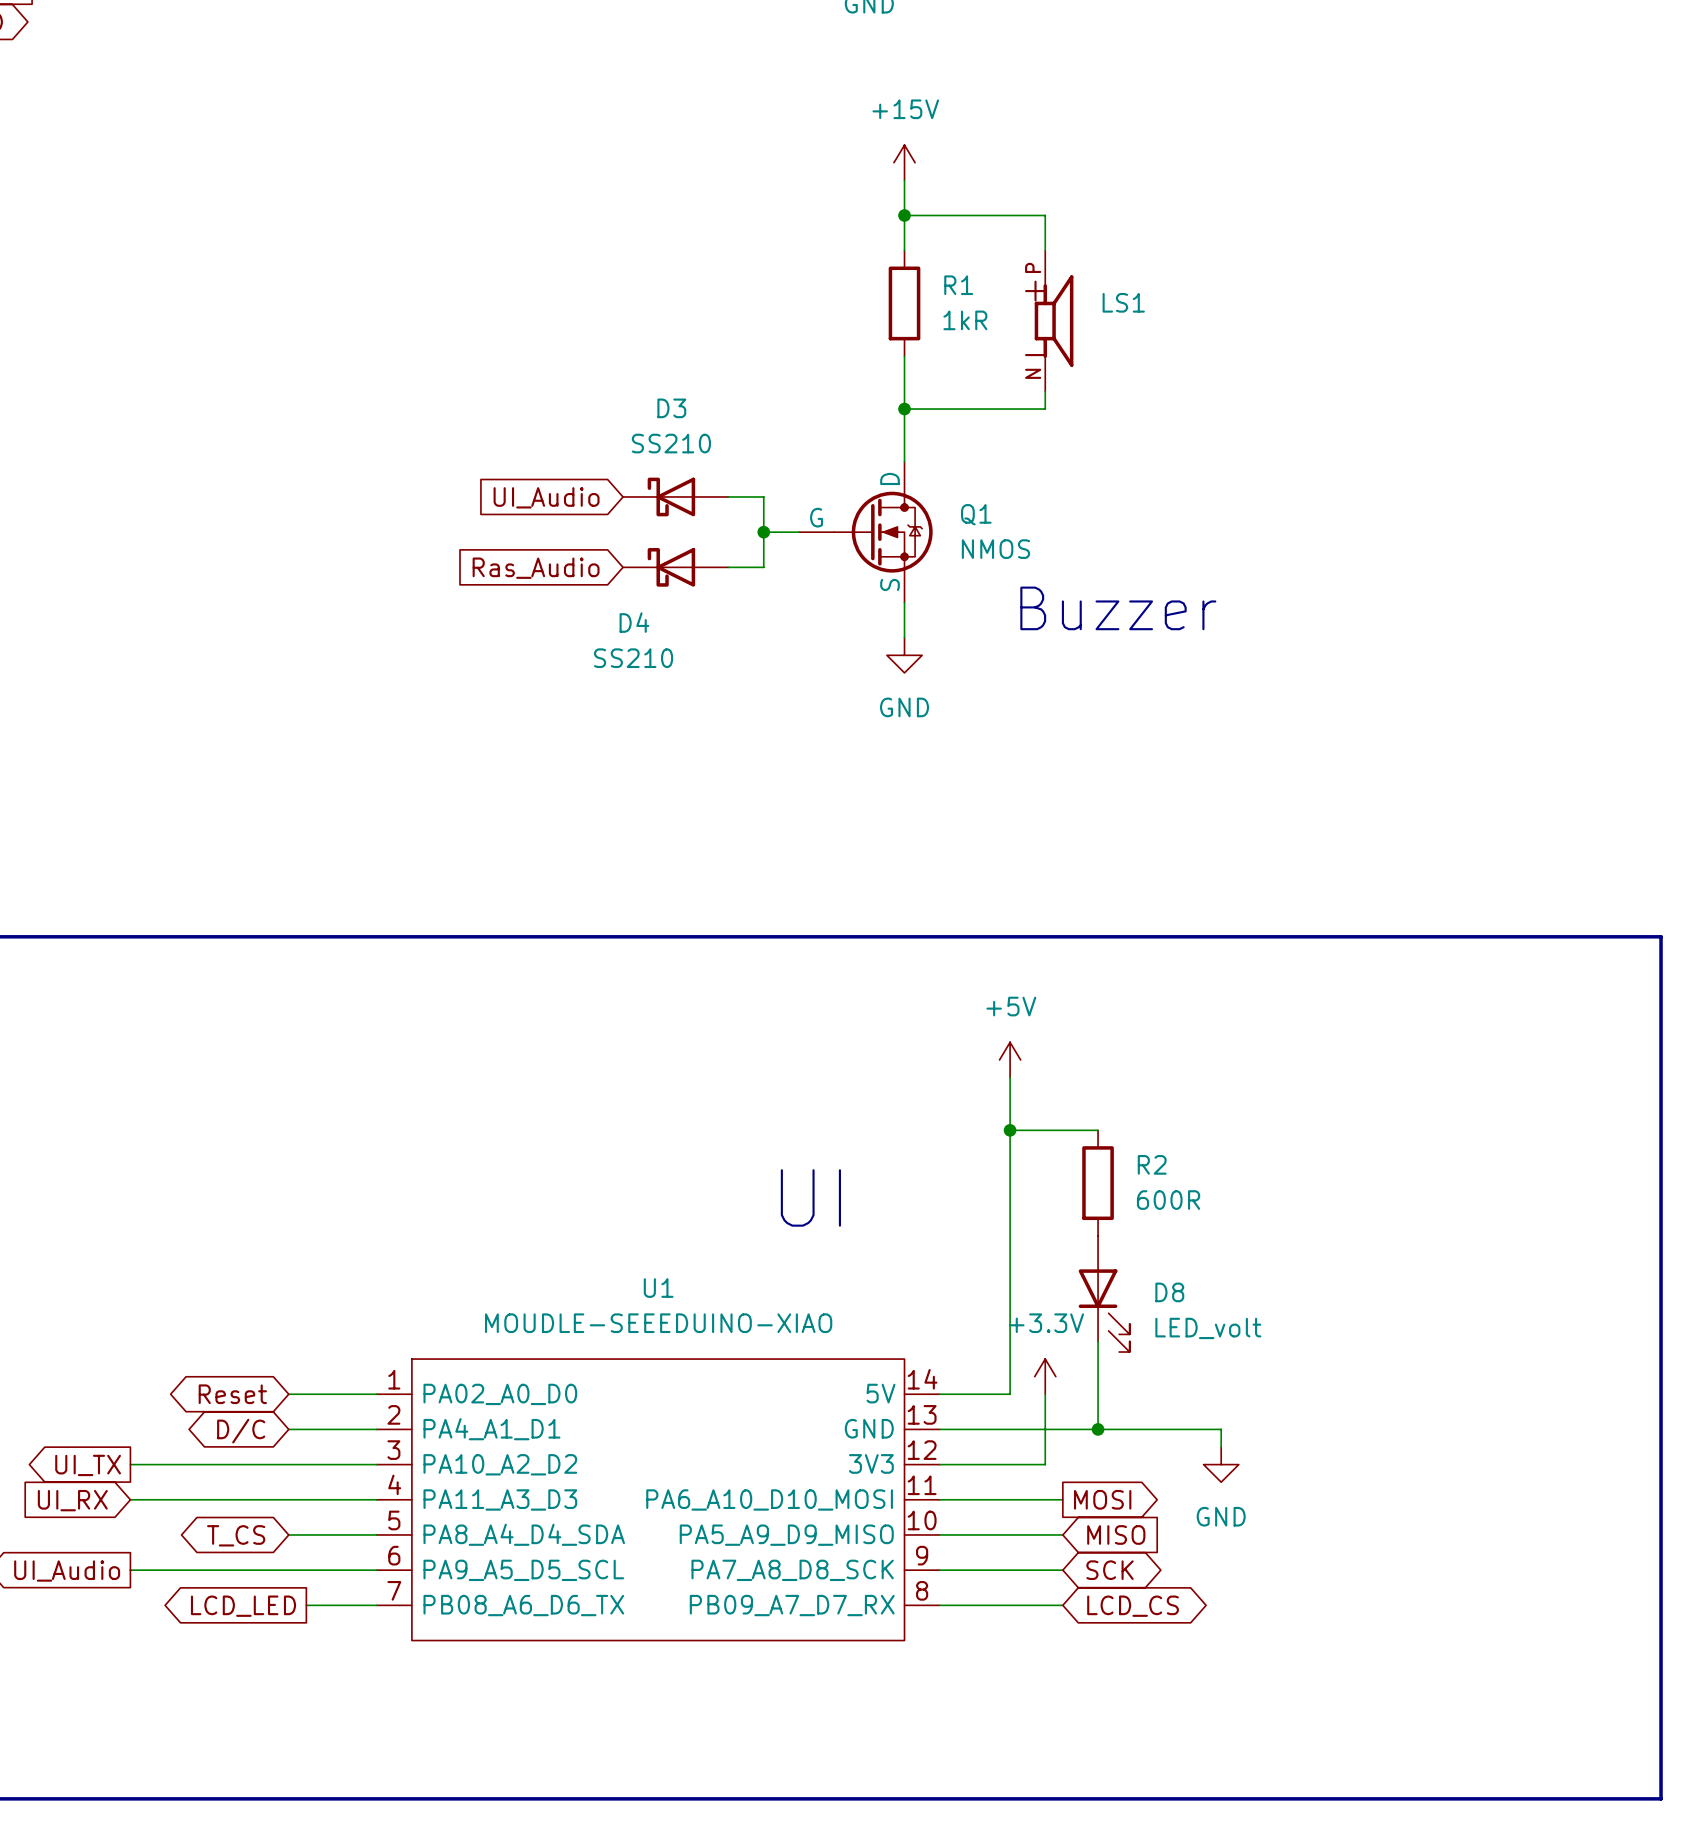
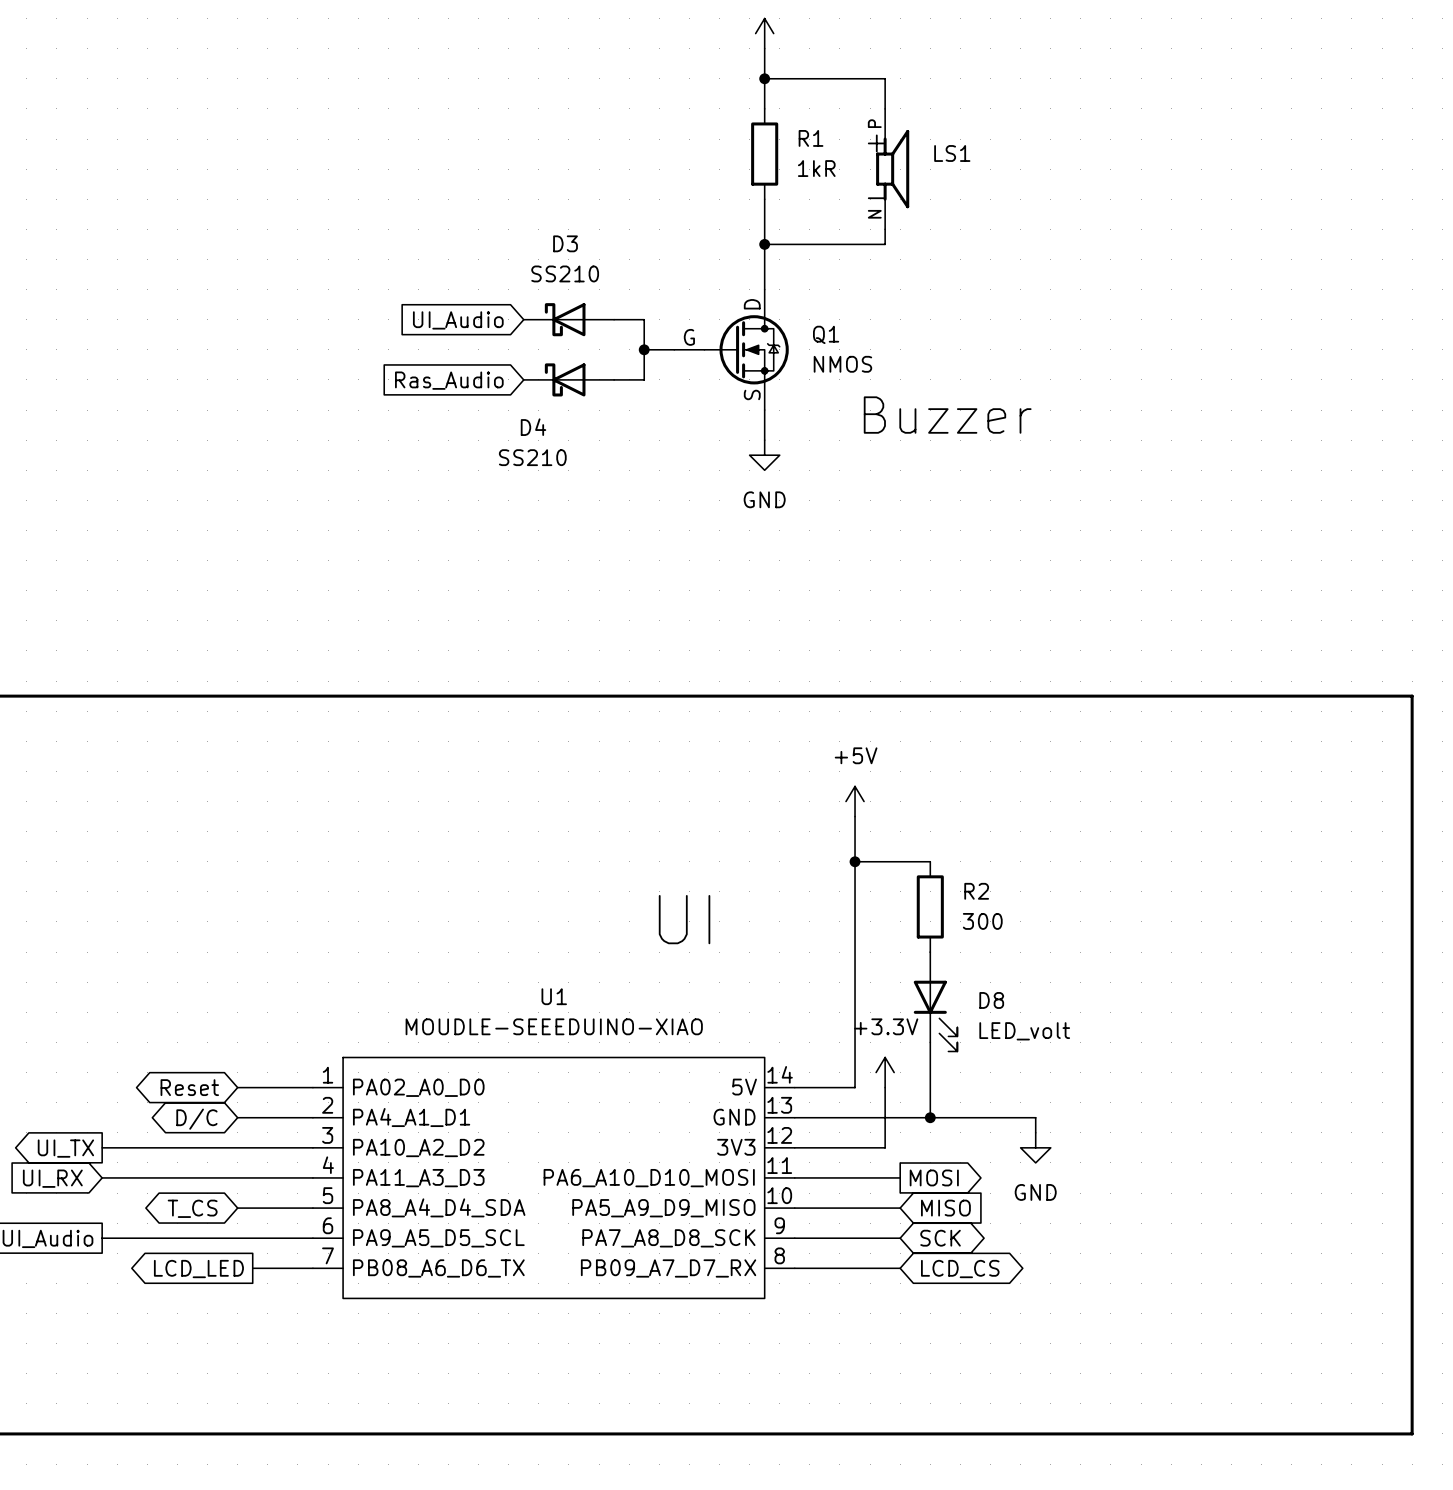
R2 value: 600R (1168, 1200) -> 300 (982, 921)

